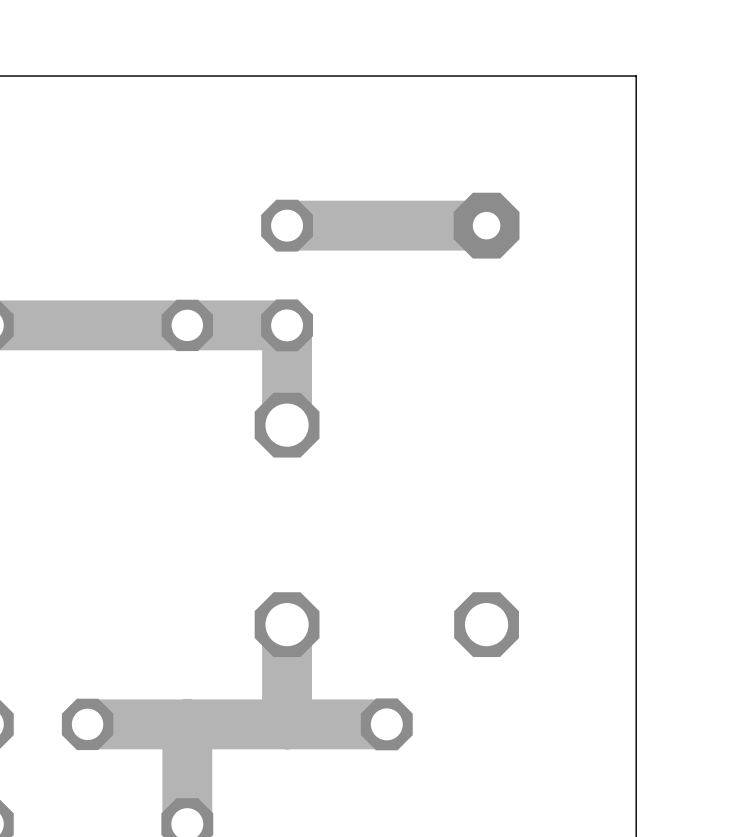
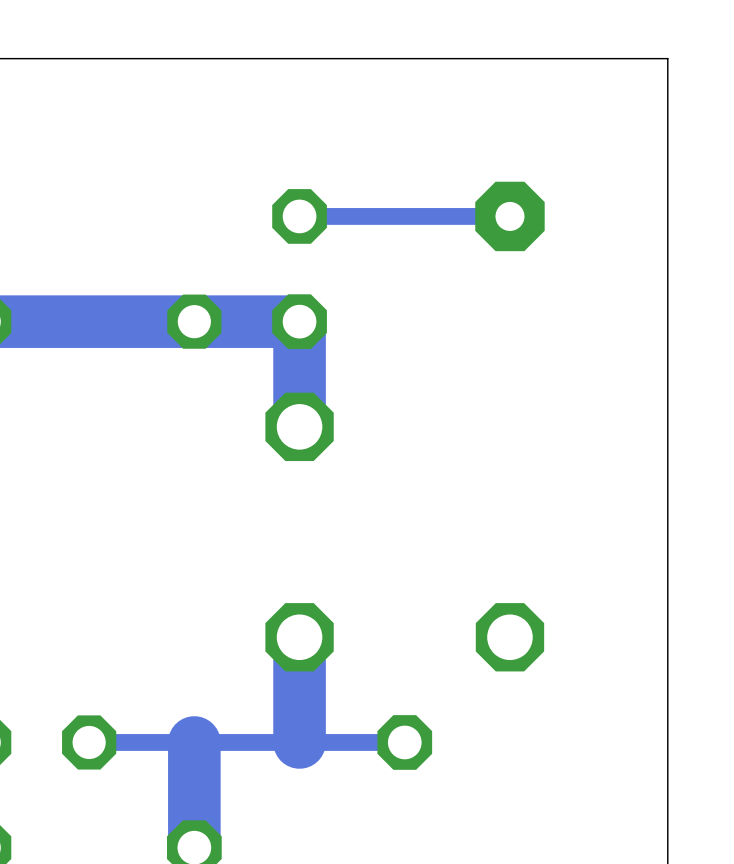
track width: thick (486, 225) (287, 225) -> thin (509, 216) (299, 216)
track width: thick (386, 724) (87, 724) -> thin (404, 742) (89, 742)

